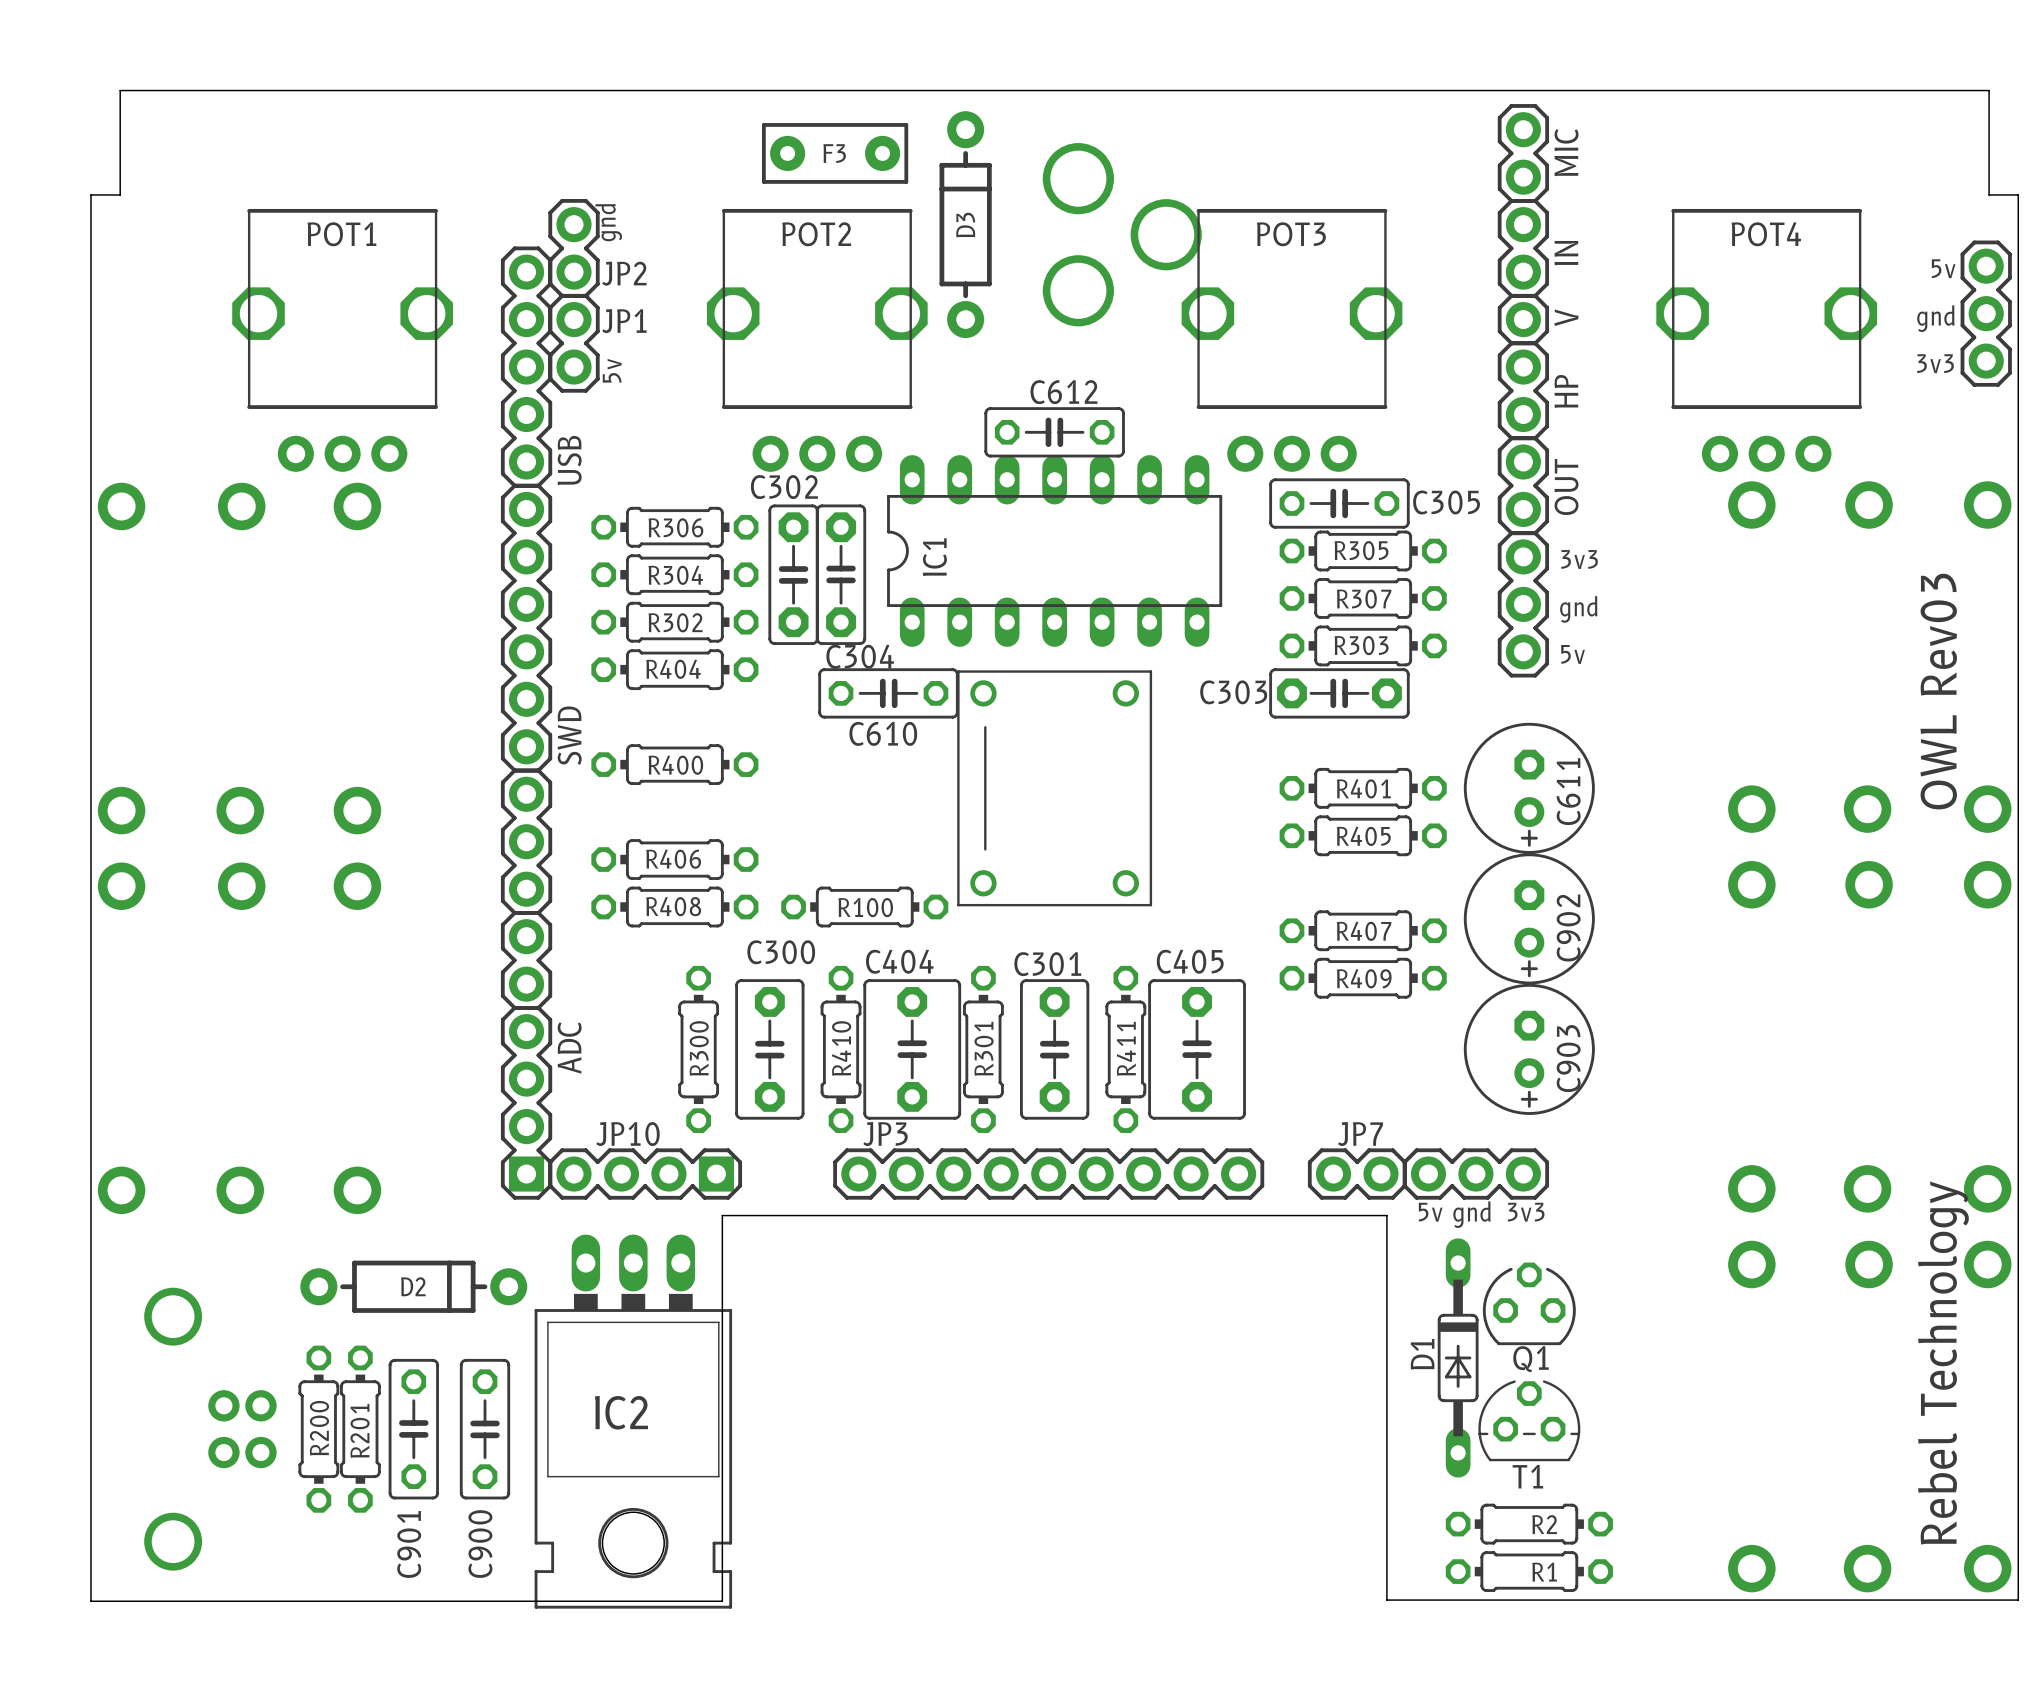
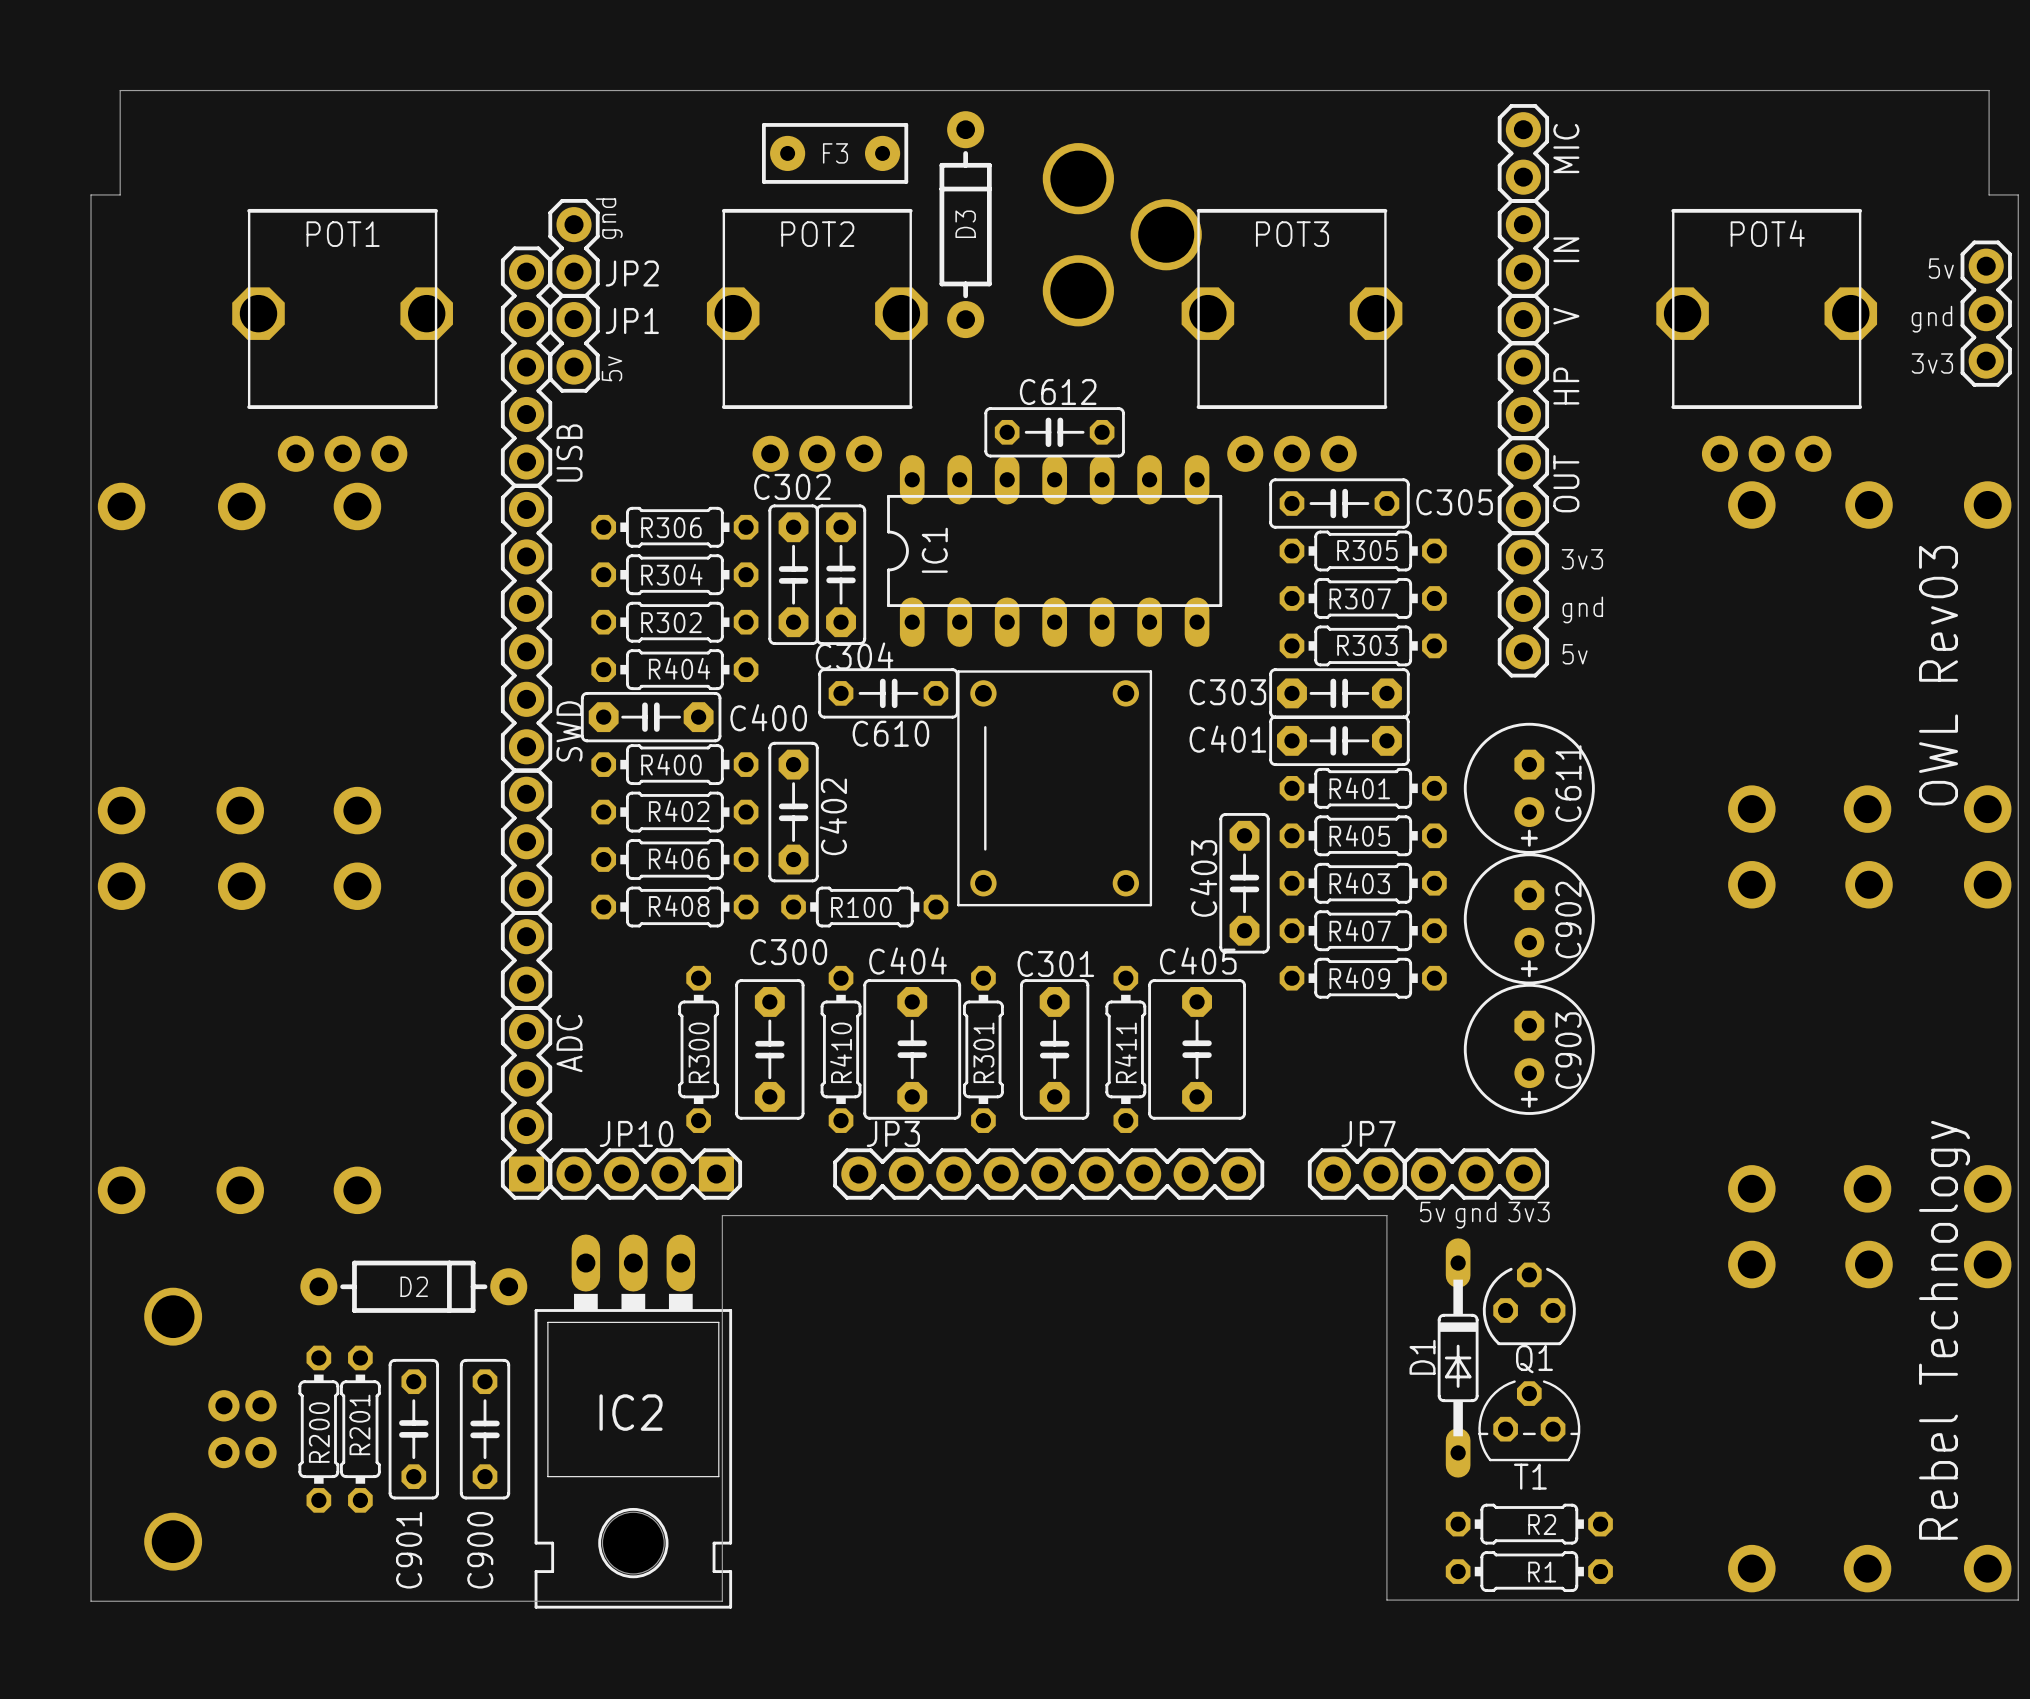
C400: none -> (651, 717)
C401: none -> (1339, 740)
R402: none -> (674, 812)
C402: none -> (793, 812)
C403: none -> (1244, 883)
R403: none -> (1363, 883)

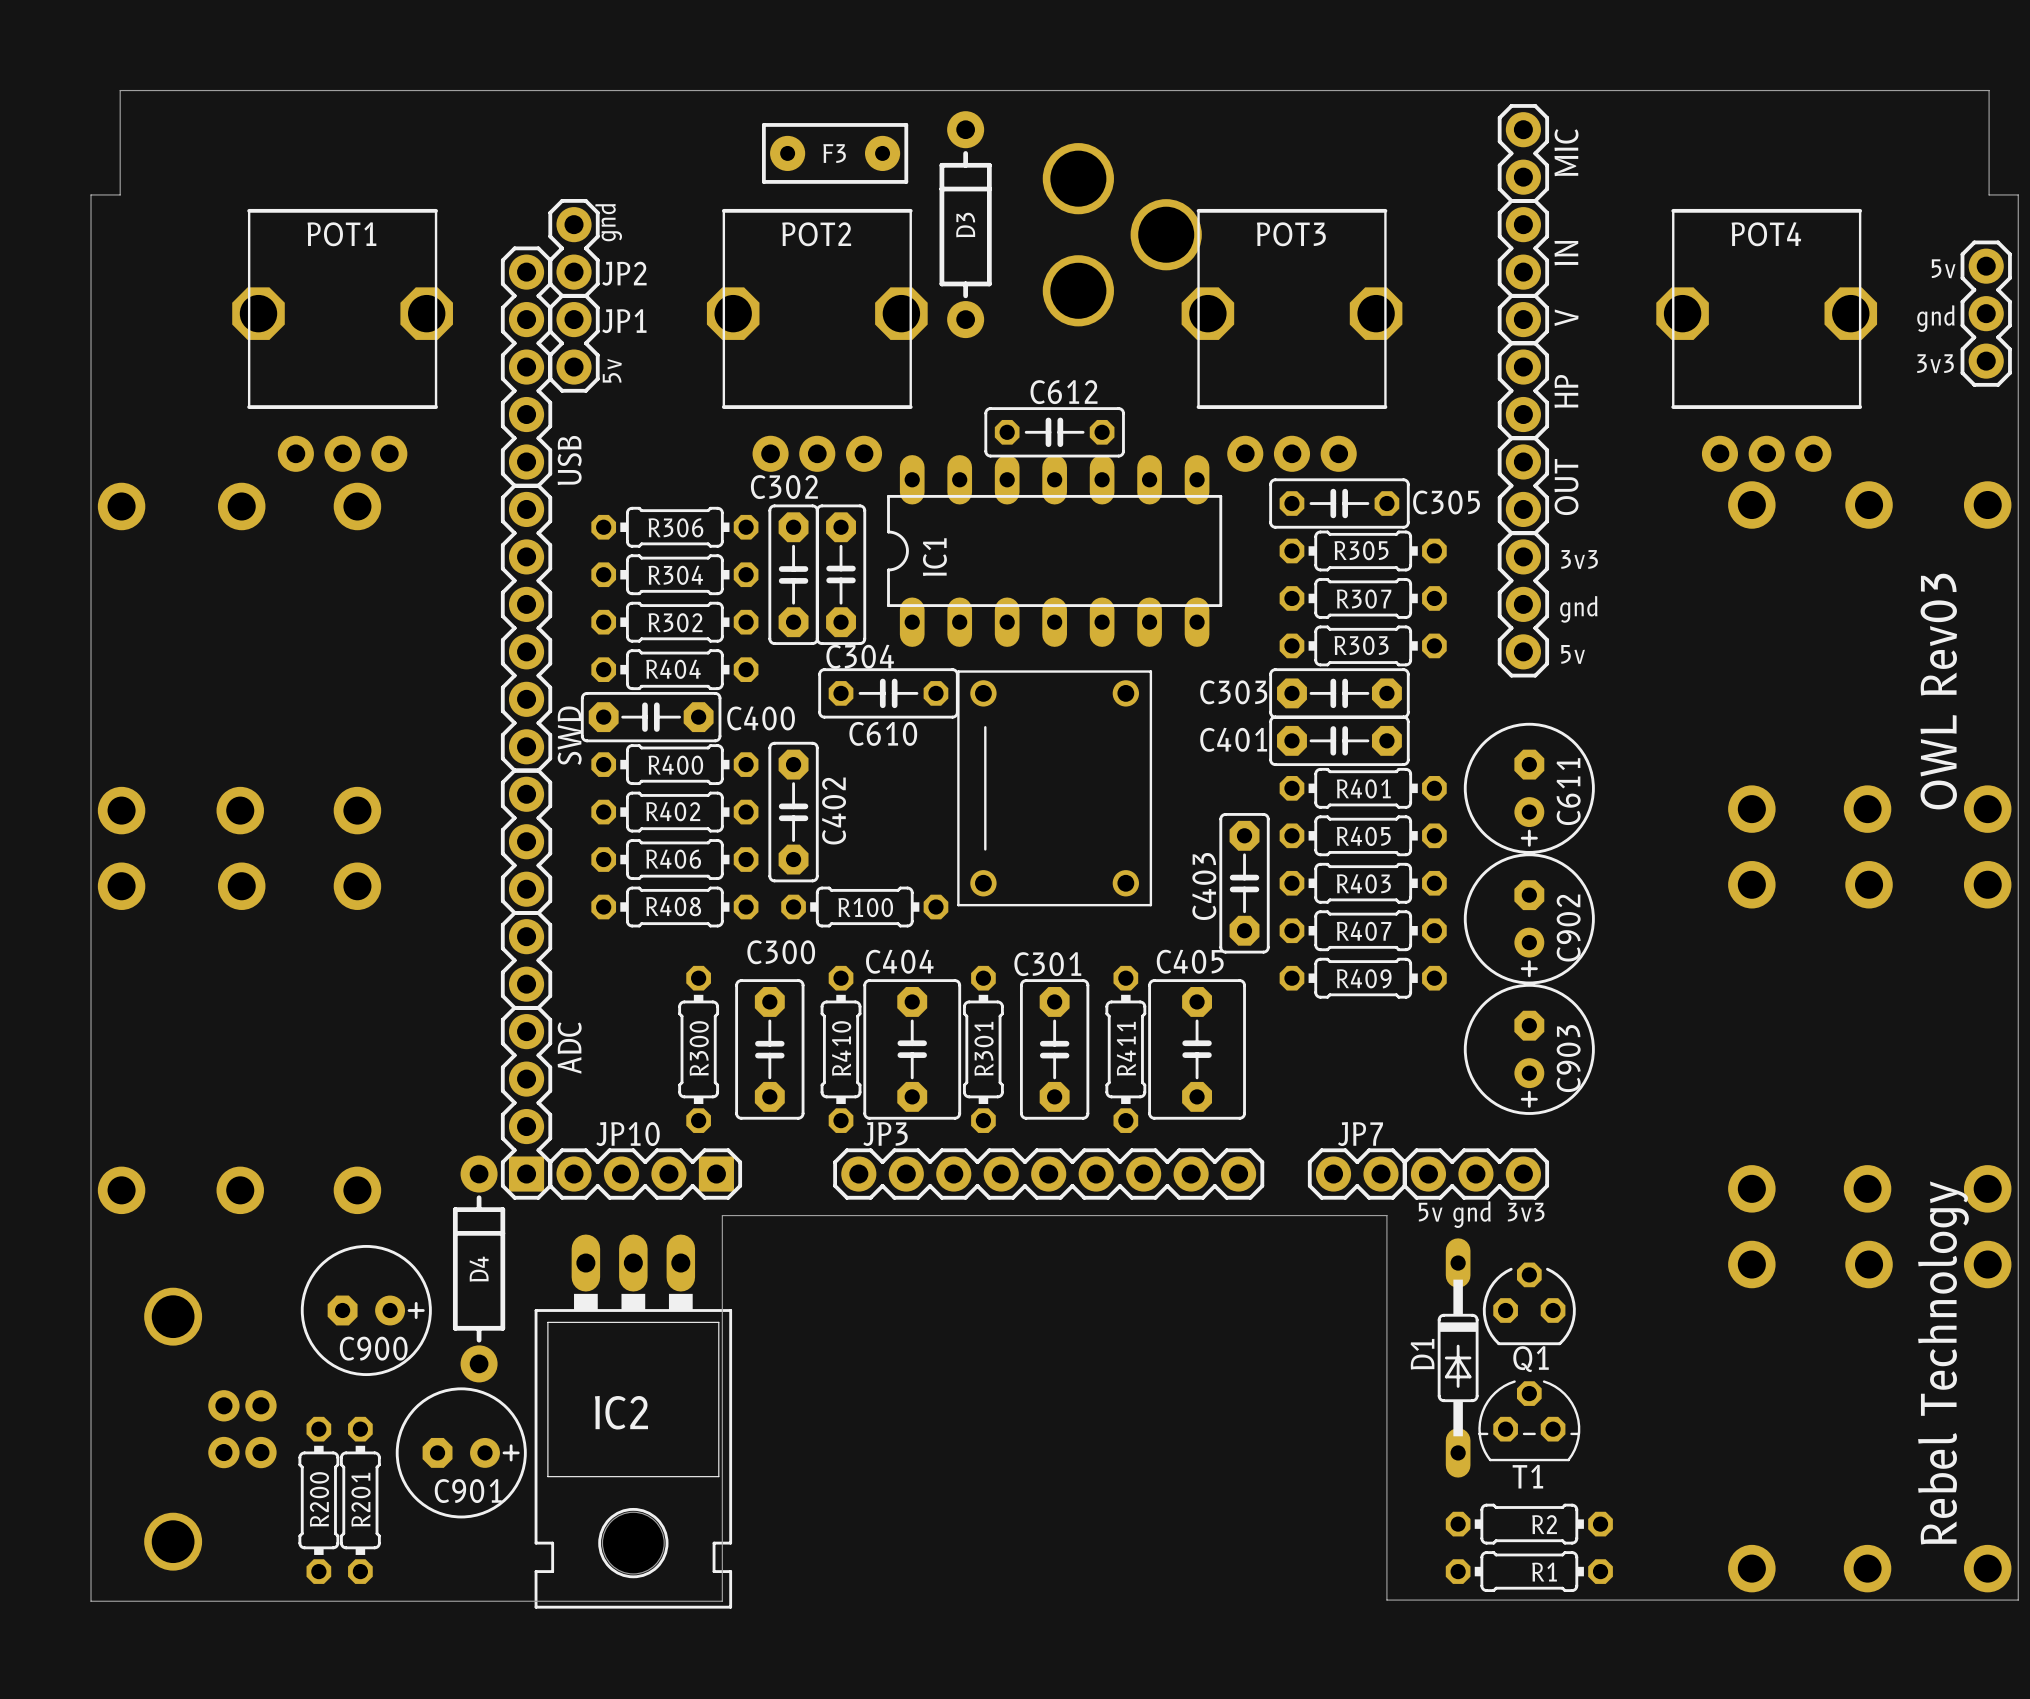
D4: none -> (479, 1268)
D2: (413, 1286) -> none
C901 footprint: [388, 1358, 439, 1500] -> [395, 1387, 527, 1519]
C900 footprint: [459, 1358, 511, 1500] -> [300, 1244, 432, 1377]
R201 name position: R201 (359, 1424) -> R201 (360, 1499)
R200 position: (318, 1429) -> (318, 1500)
R201 position: (360, 1429) -> (360, 1500)
C901 name position: C901 (409, 1550) -> C901 (468, 1491)
C900 name position: C900 (480, 1550) -> C900 (373, 1348)

